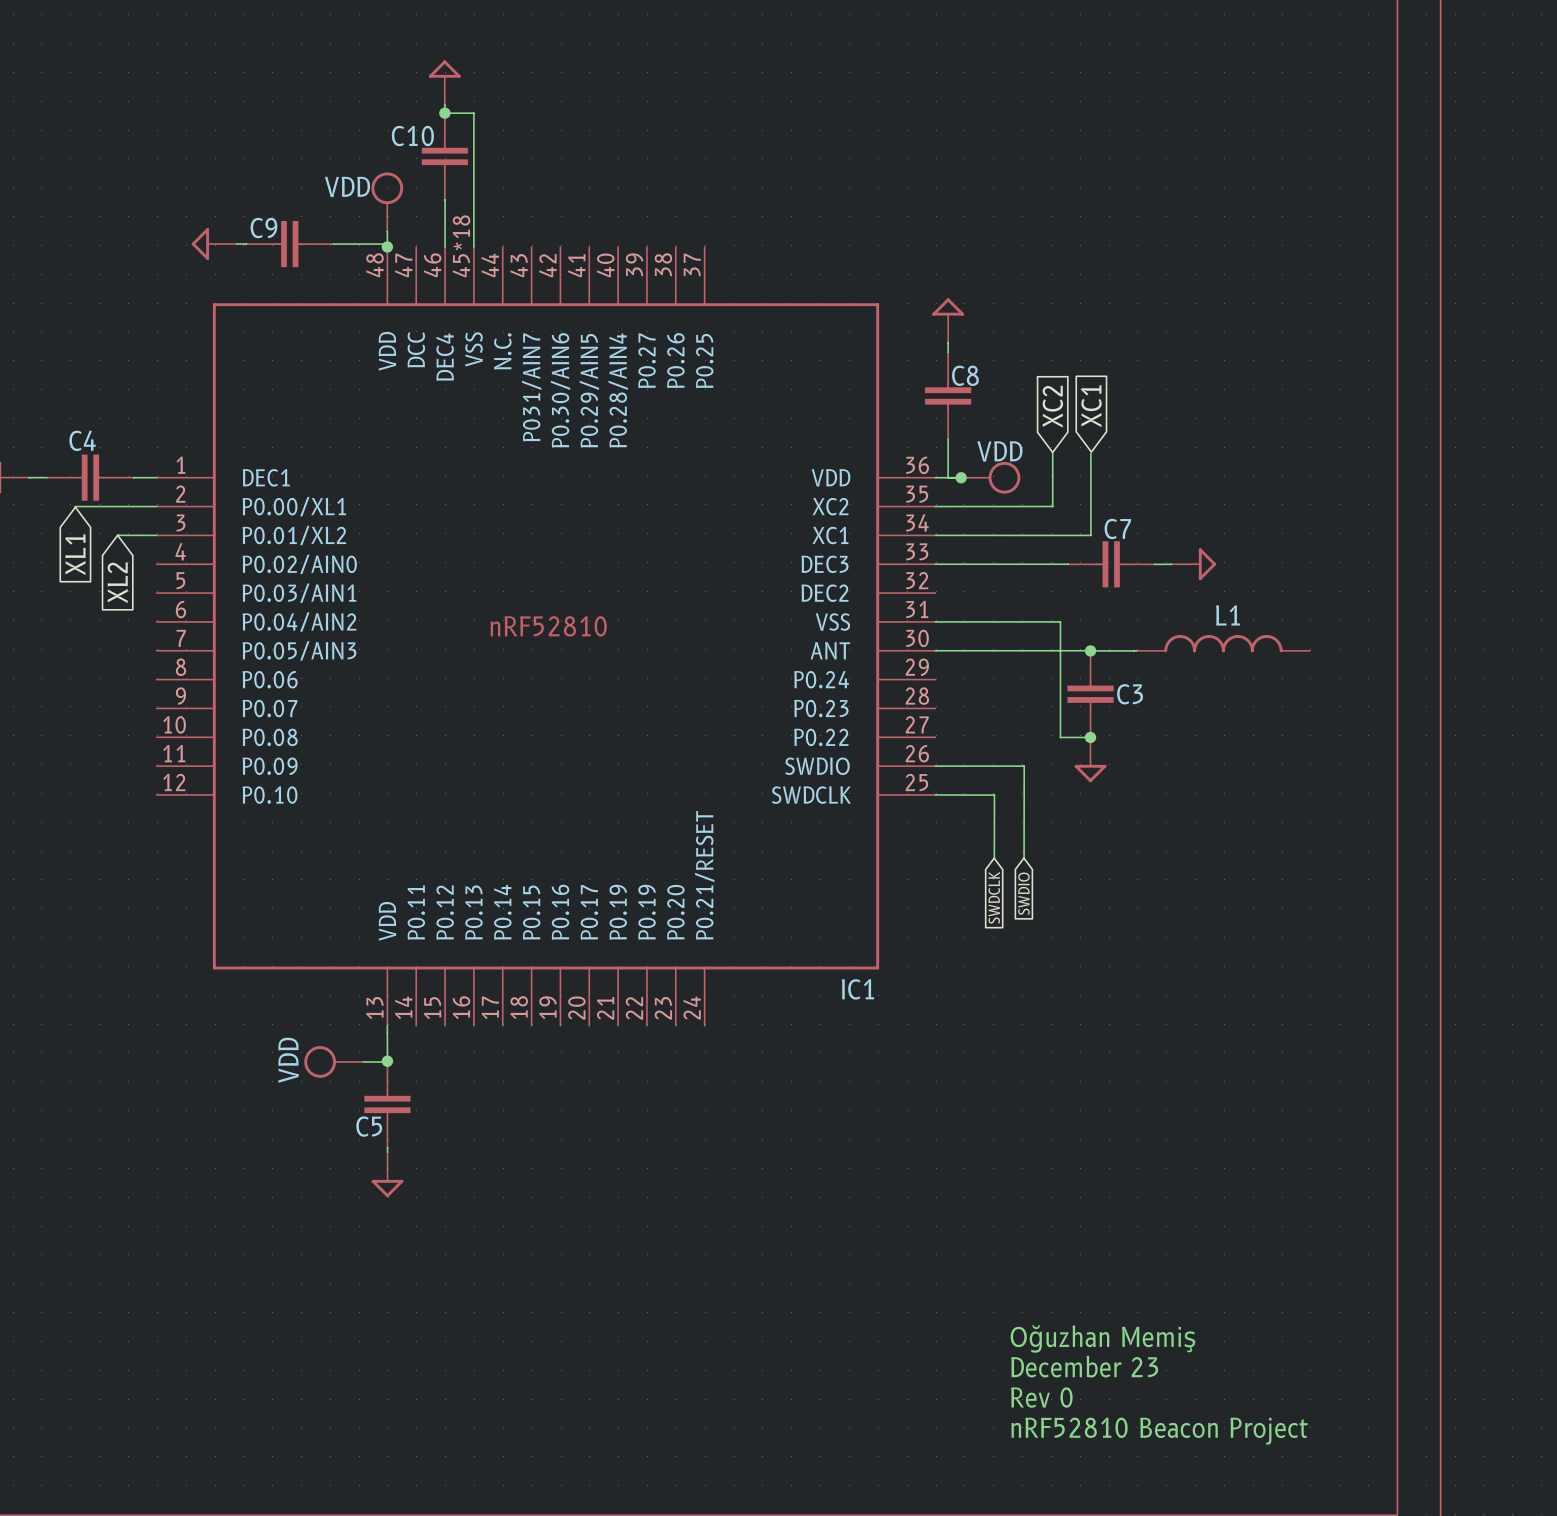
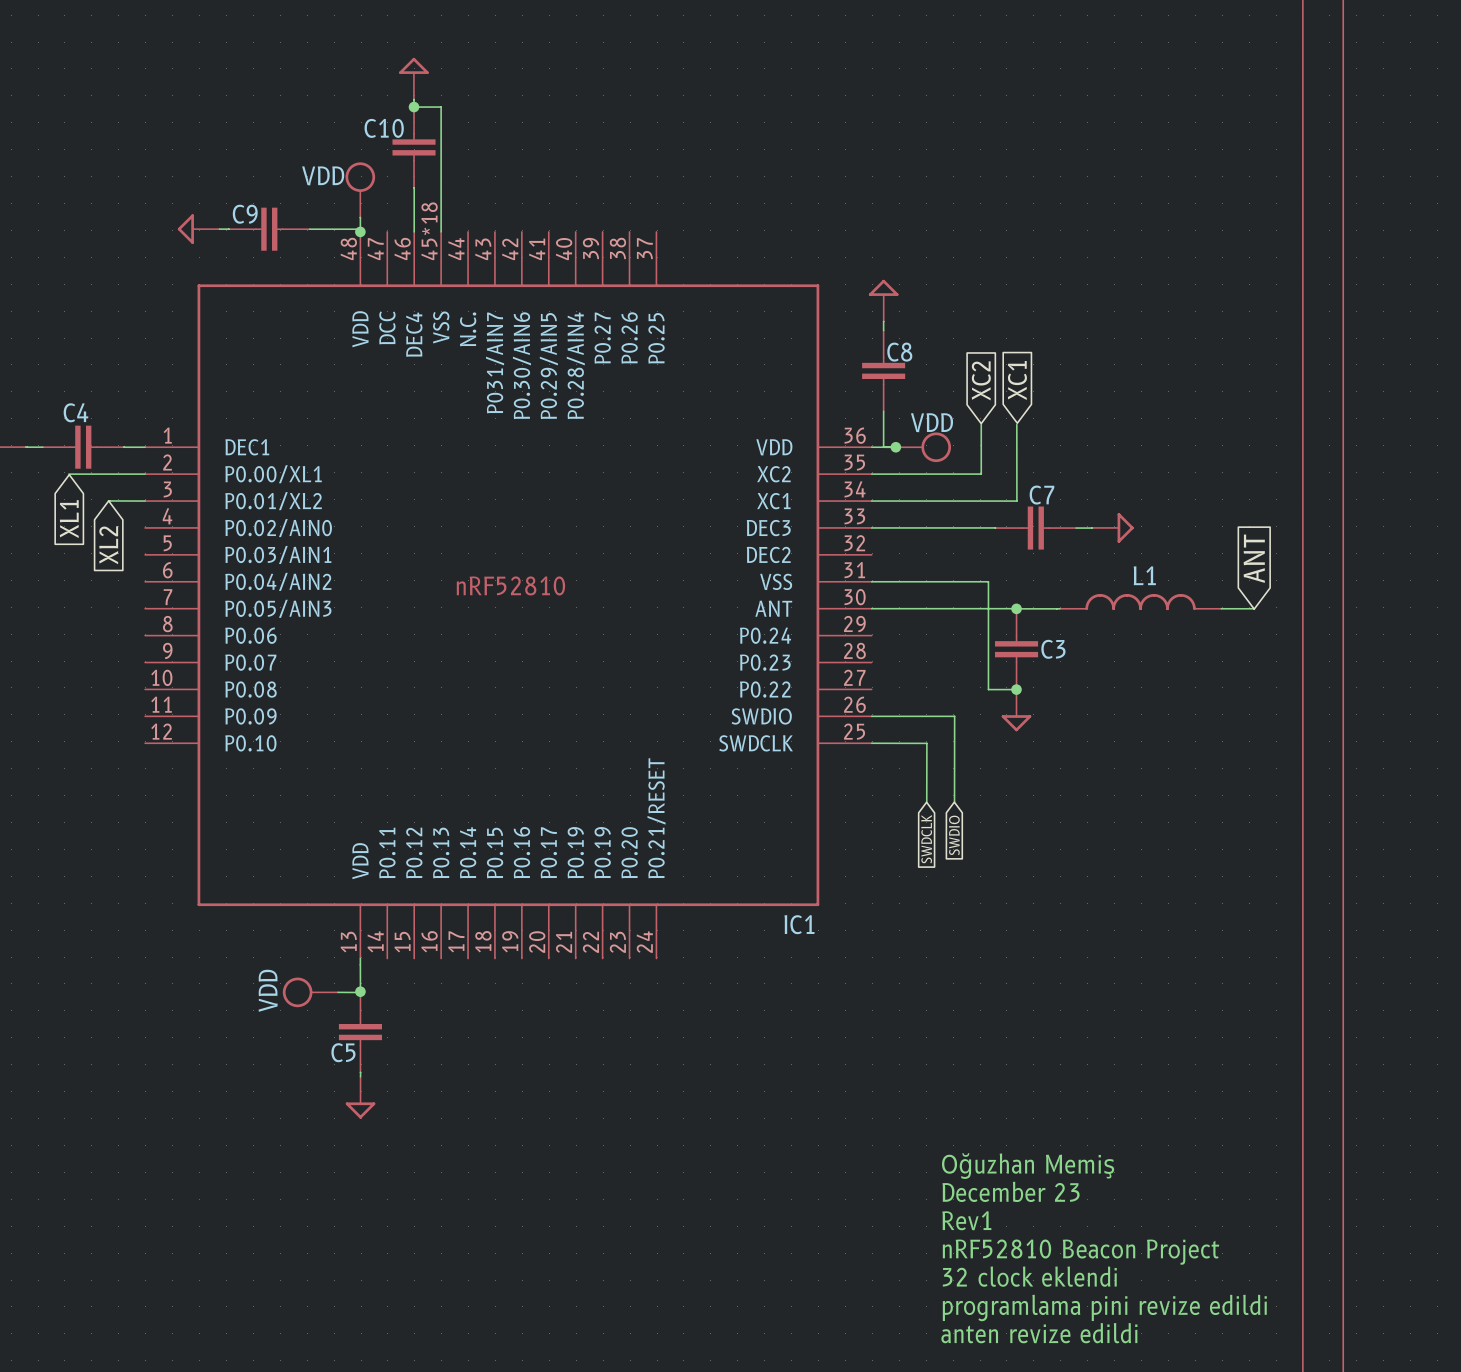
global label: none -> ANT (1254, 558)
wire: none -> (1221, 608) (1254, 609)
text: none -> Oğuzhan Memiş (1028, 1166)
text: none -> December 23 (1011, 1191)
text: none -> Rev1 (966, 1220)
text: Oğuzhan Memiş (1102, 1338) -> nRF52810 Beacon Project (1081, 1252)
text: December 23 (1084, 1366) -> 32 clock eklendi (1029, 1276)
text: Rev 0 (1041, 1397) -> programlama pini revize edildi (1104, 1307)
text: nRF52810 Beacon Project (1159, 1431) -> anten revize edildi (1039, 1333)

